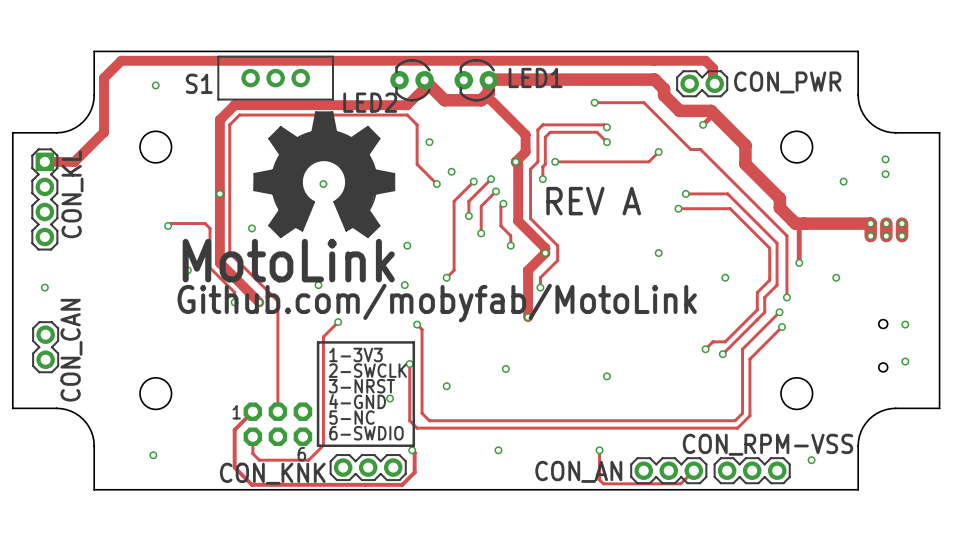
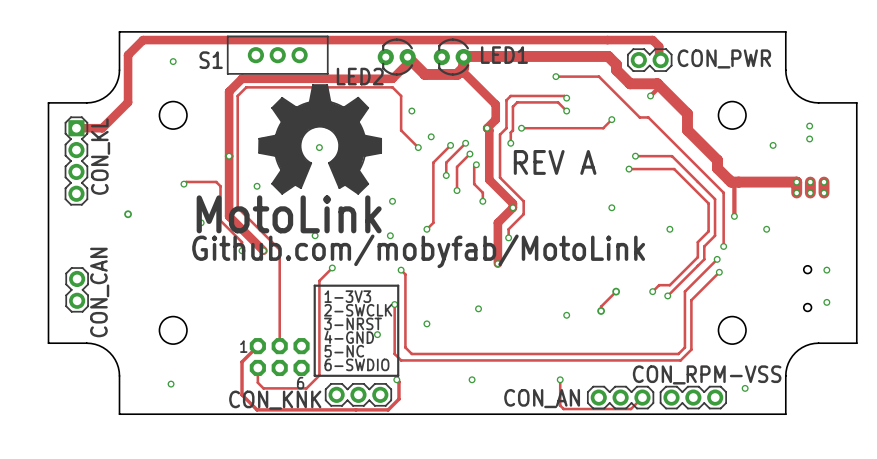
via: none -> (128, 214)
via: (44, 287) -> none
track: none -> (616, 291) (601, 306) (601, 310)
via: none -> (616, 291)
via: none -> (601, 310)

